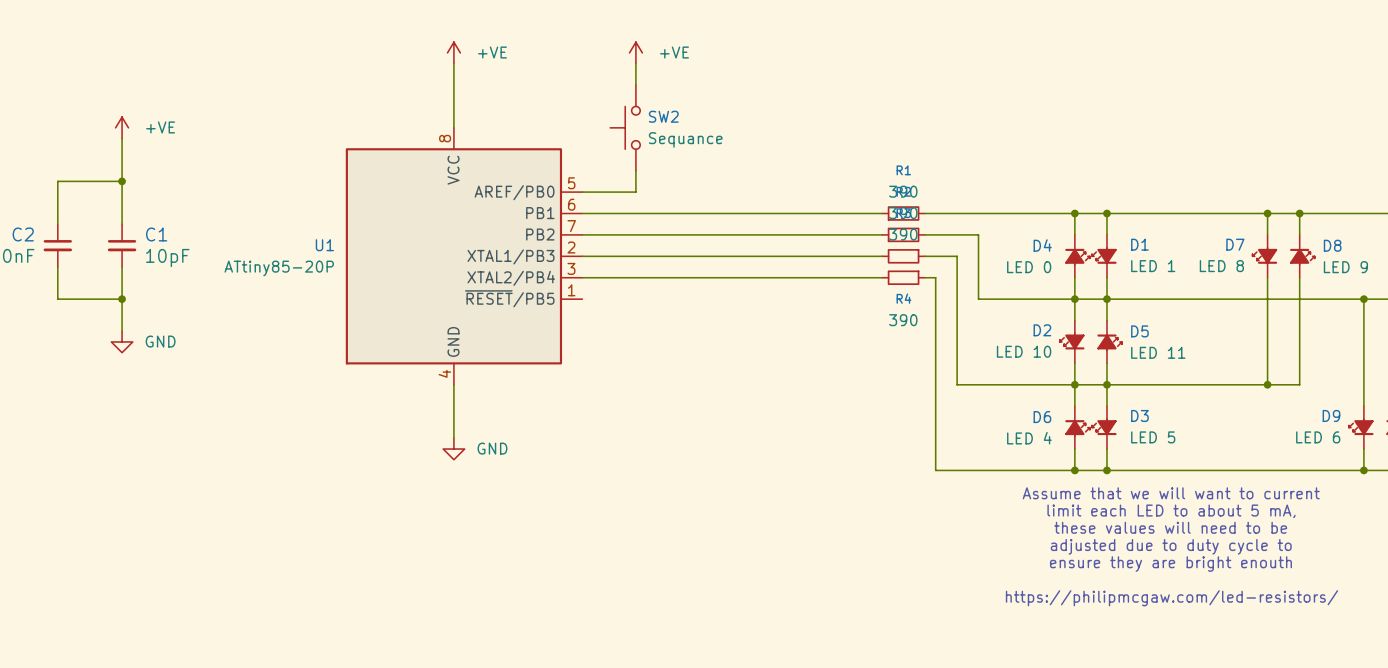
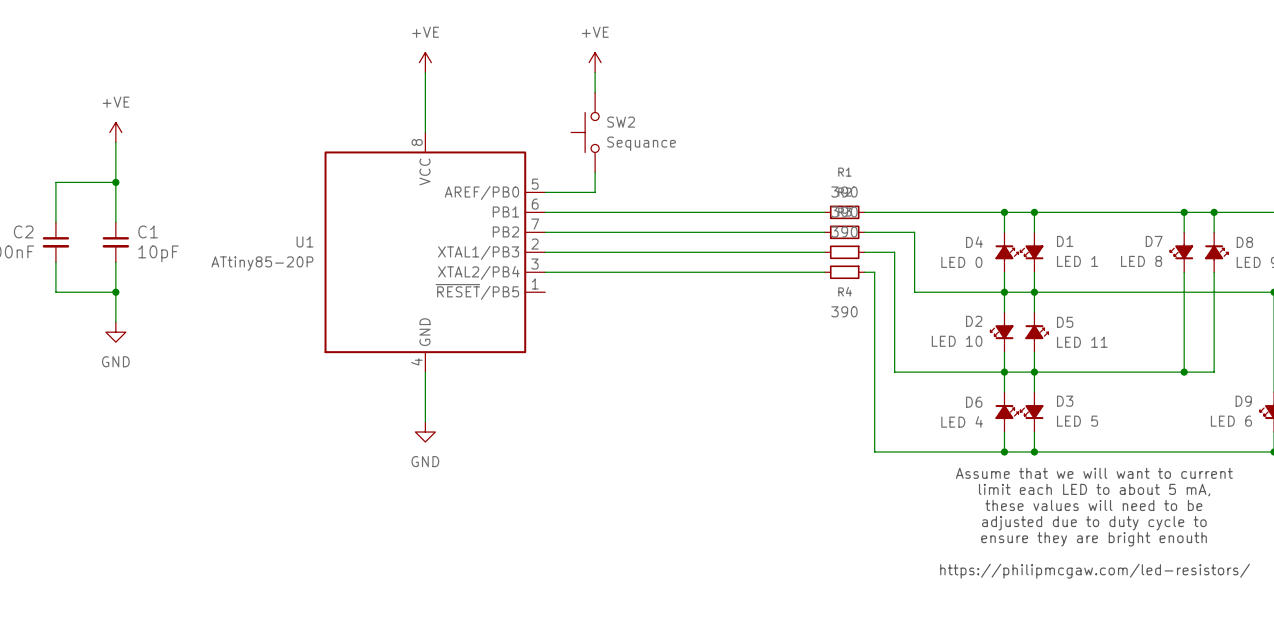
power symbol text position: +VE (492, 52) -> +VE (425, 32)
power symbol text position: +VE (674, 52) -> +VE (595, 32)
power symbol text position: +VE (160, 127) -> +VE (116, 102)
power symbol text position: GND (160, 341) -> GND (115, 361)
power symbol text position: GND (492, 448) -> GND (425, 461)

